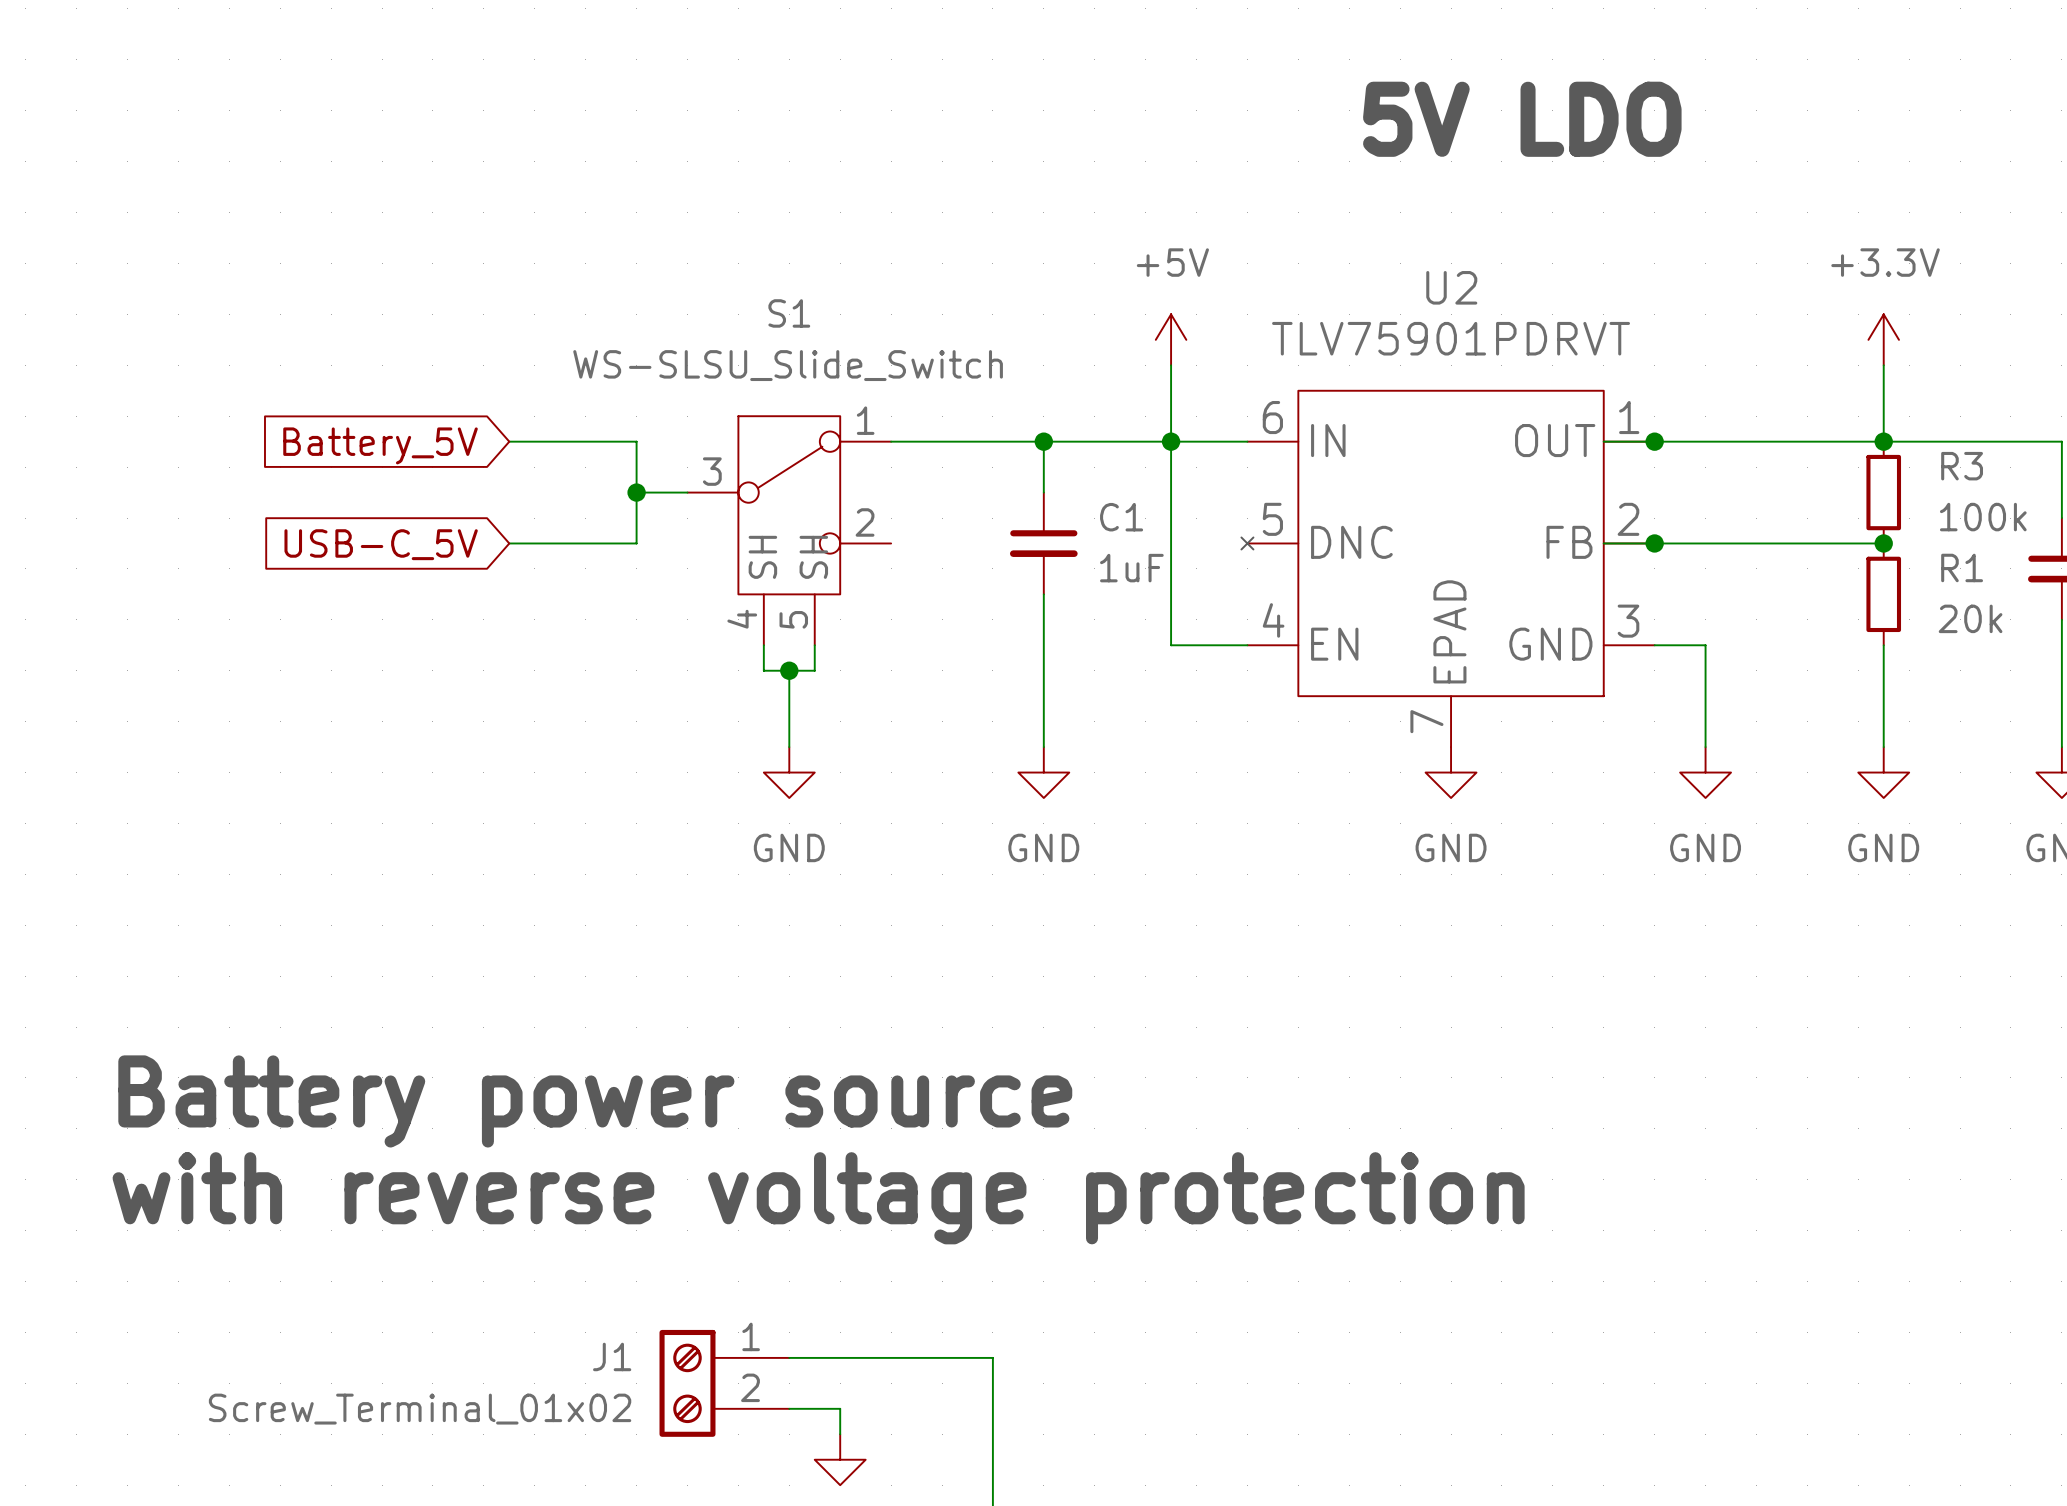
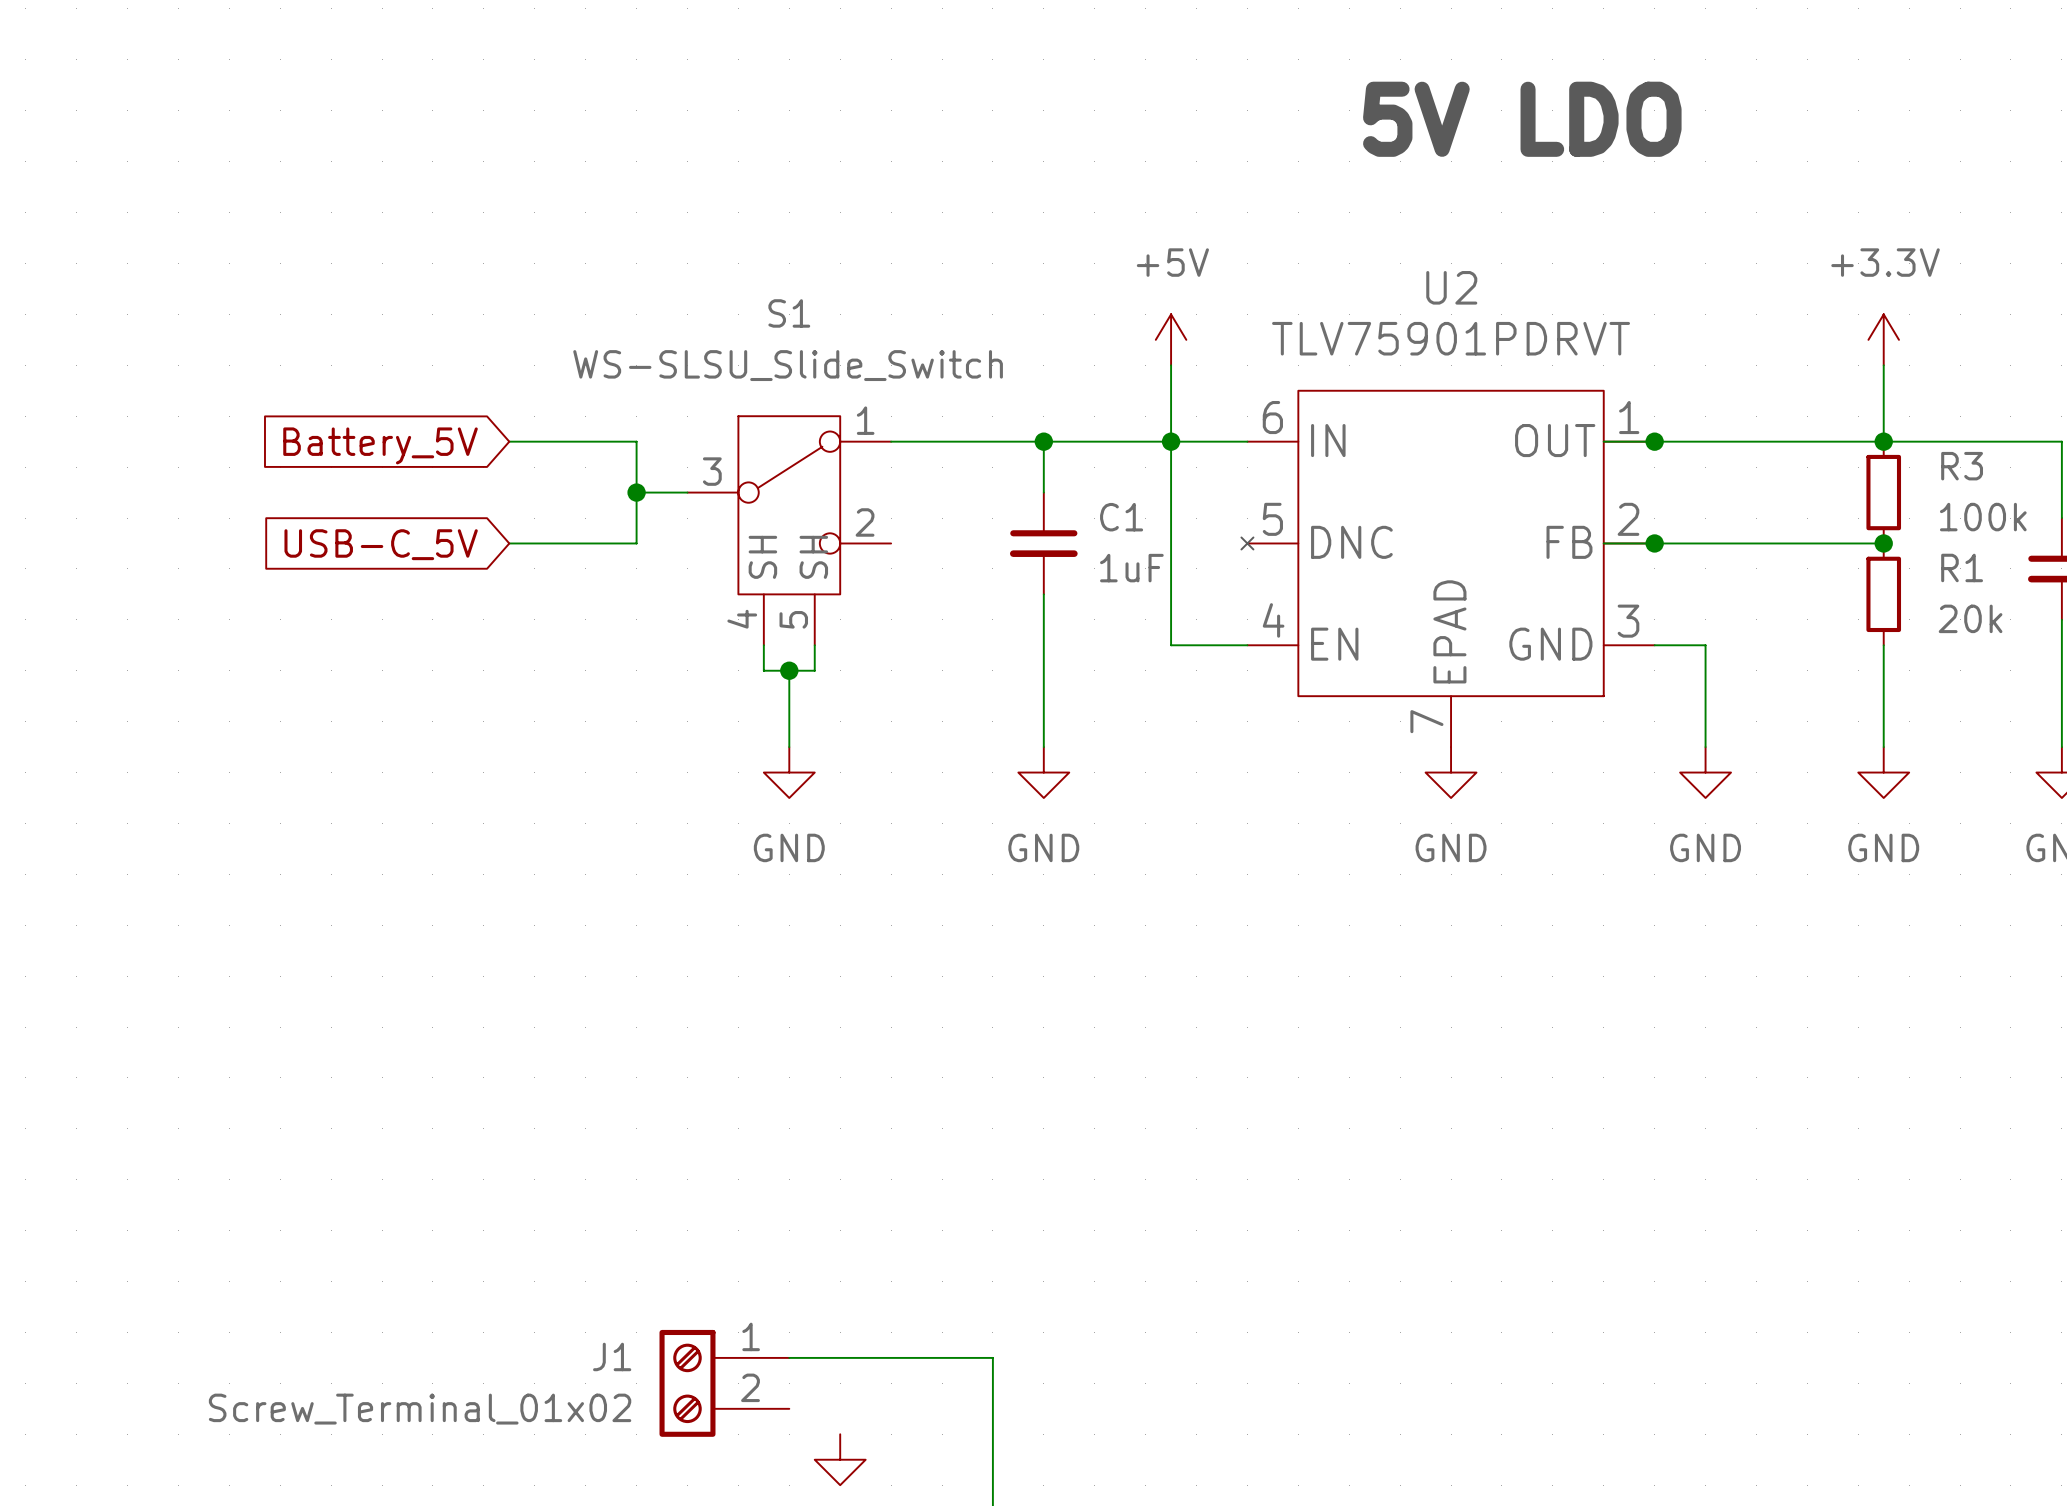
text: Battery power source (595, 1101) -> none
text: with reverse voltage protection (818, 1198) -> none
wire: (789, 1408) (840, 1408) (840, 1434) -> none

